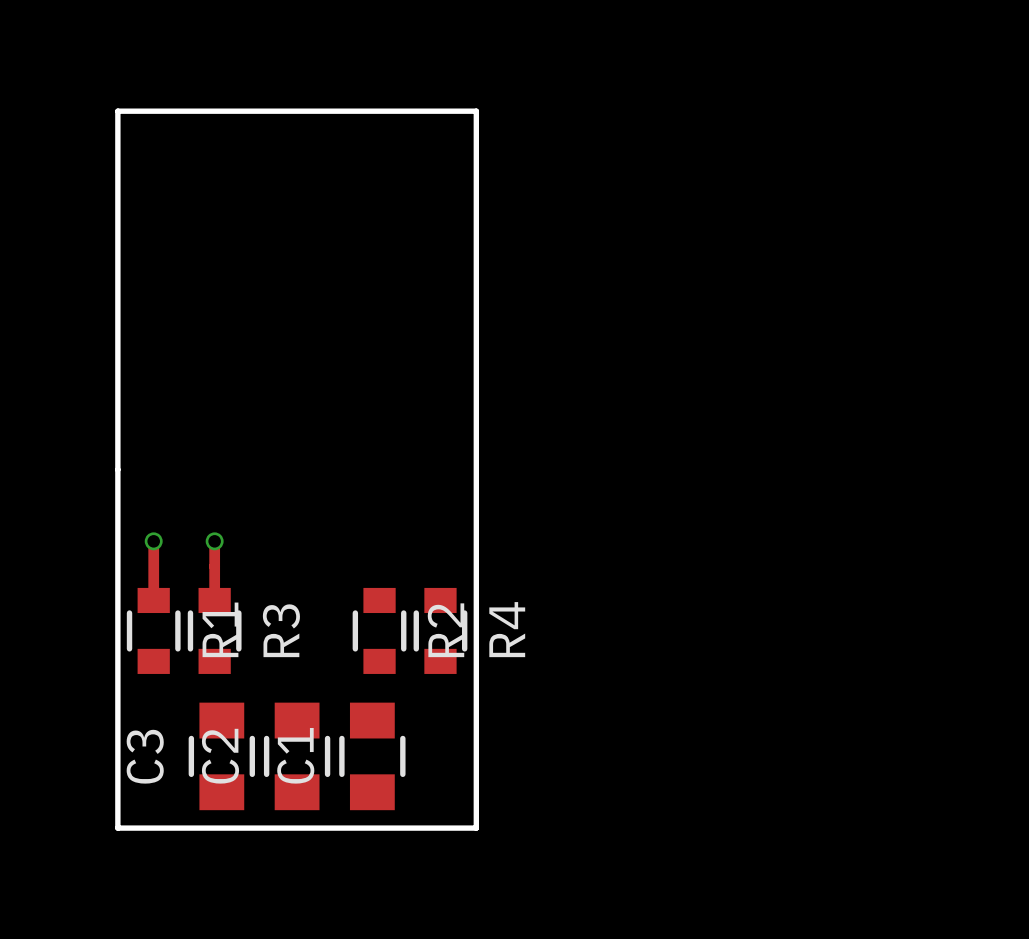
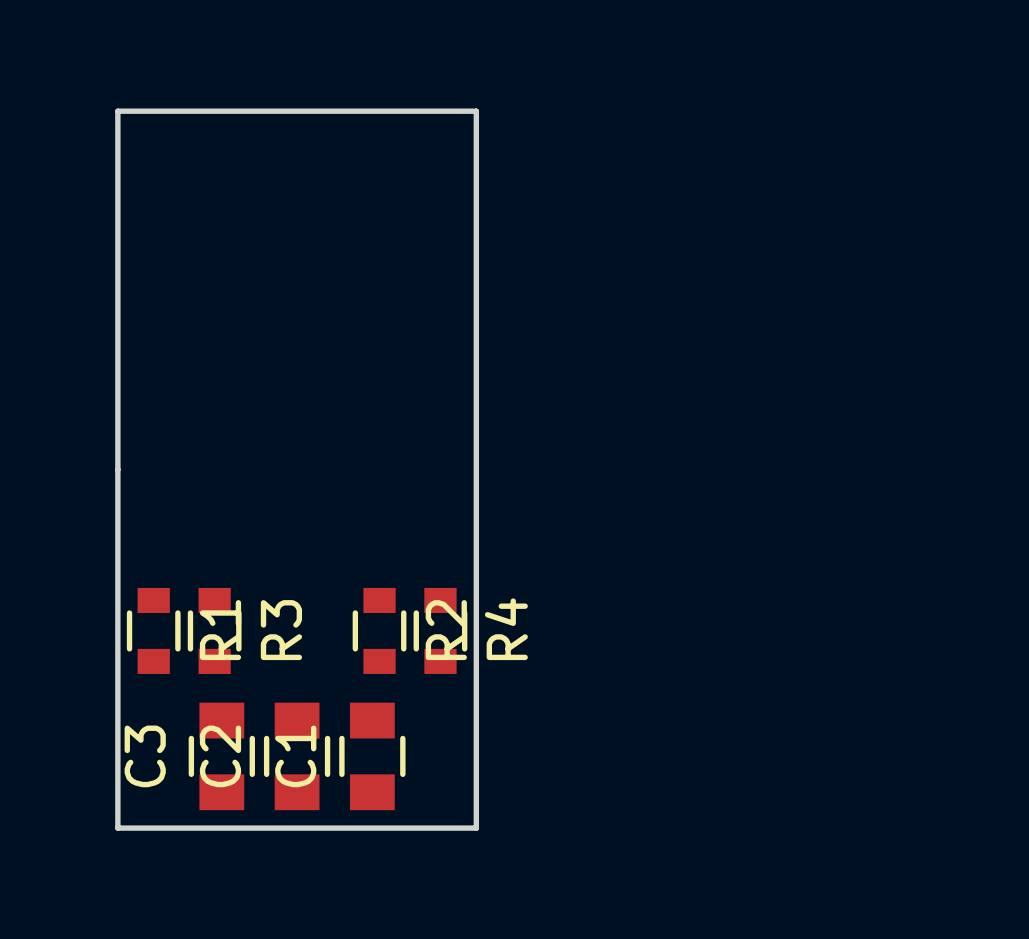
track: (153, 541) (153, 600) -> none
via: (153, 541) -> none
track: (214, 541) (214, 600) -> none
via: (214, 541) -> none

